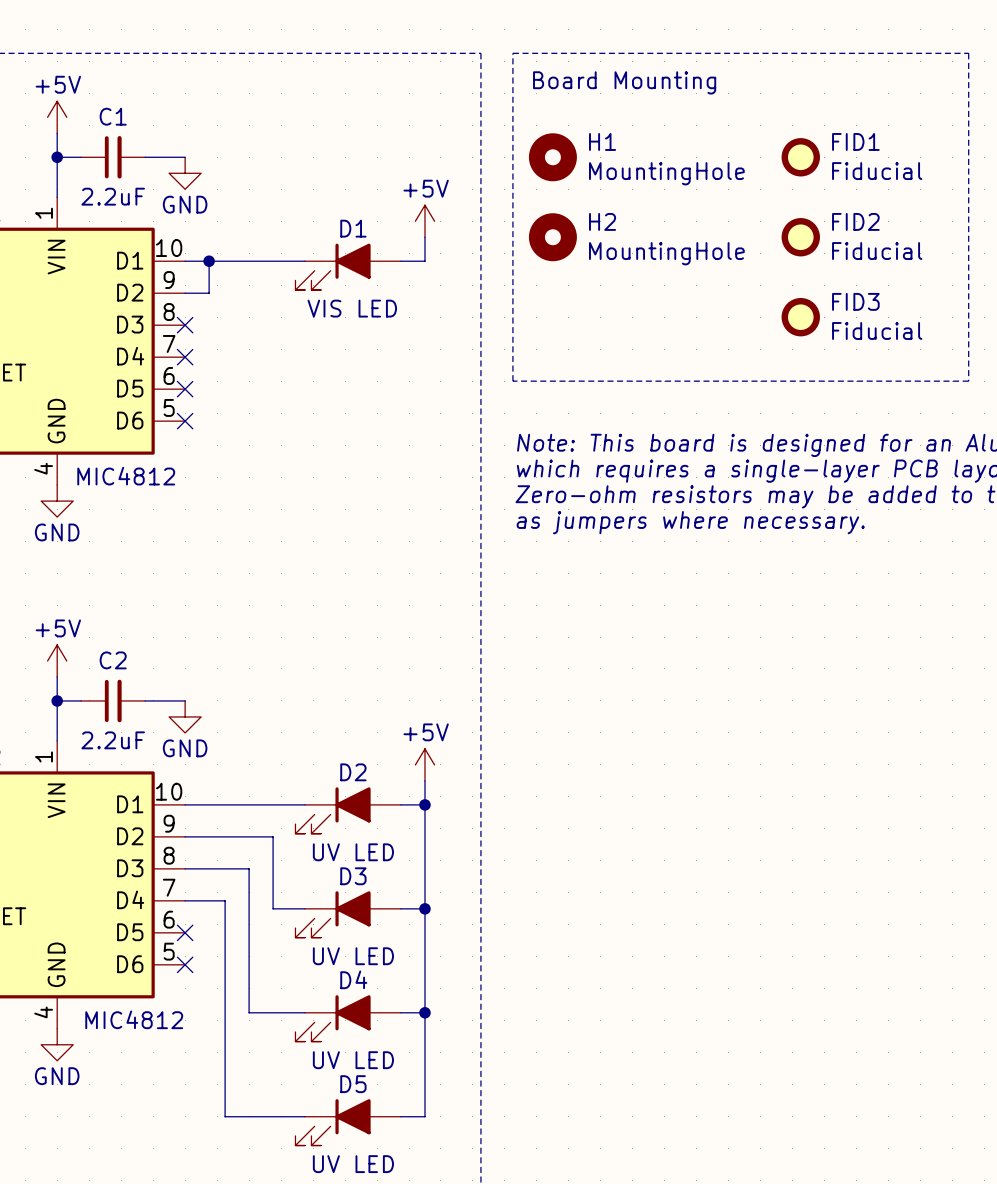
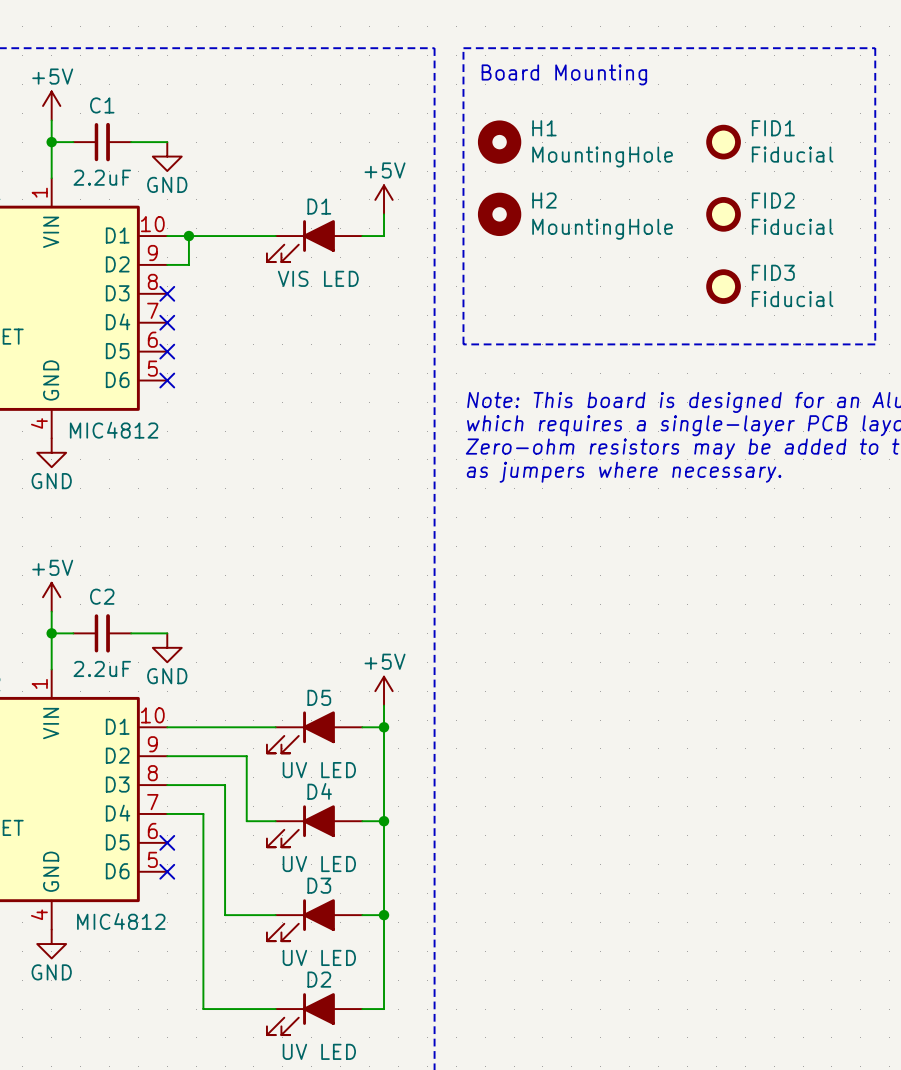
D2 name: D2 (353, 772) -> D5 (319, 697)
D3 name: D3 (353, 876) -> D4 (319, 791)
D4 name: D4 (353, 979) -> D3 (319, 885)
D5 name: D5 (353, 1084) -> D2 (319, 979)

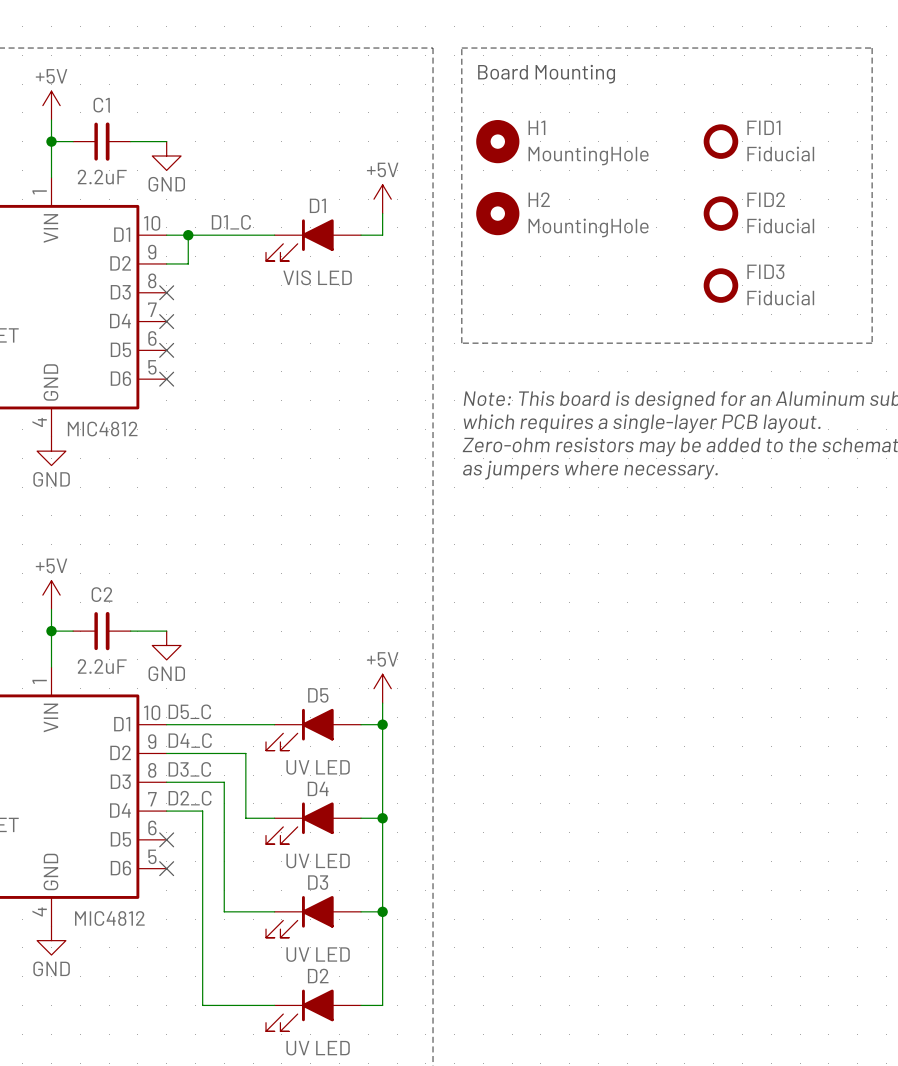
label: none -> D1_C (231, 222)
label: none -> D5_C (189, 711)
label: none -> D4_C (190, 740)
label: none -> D3_C (189, 769)
label: none -> D2_C (190, 798)

